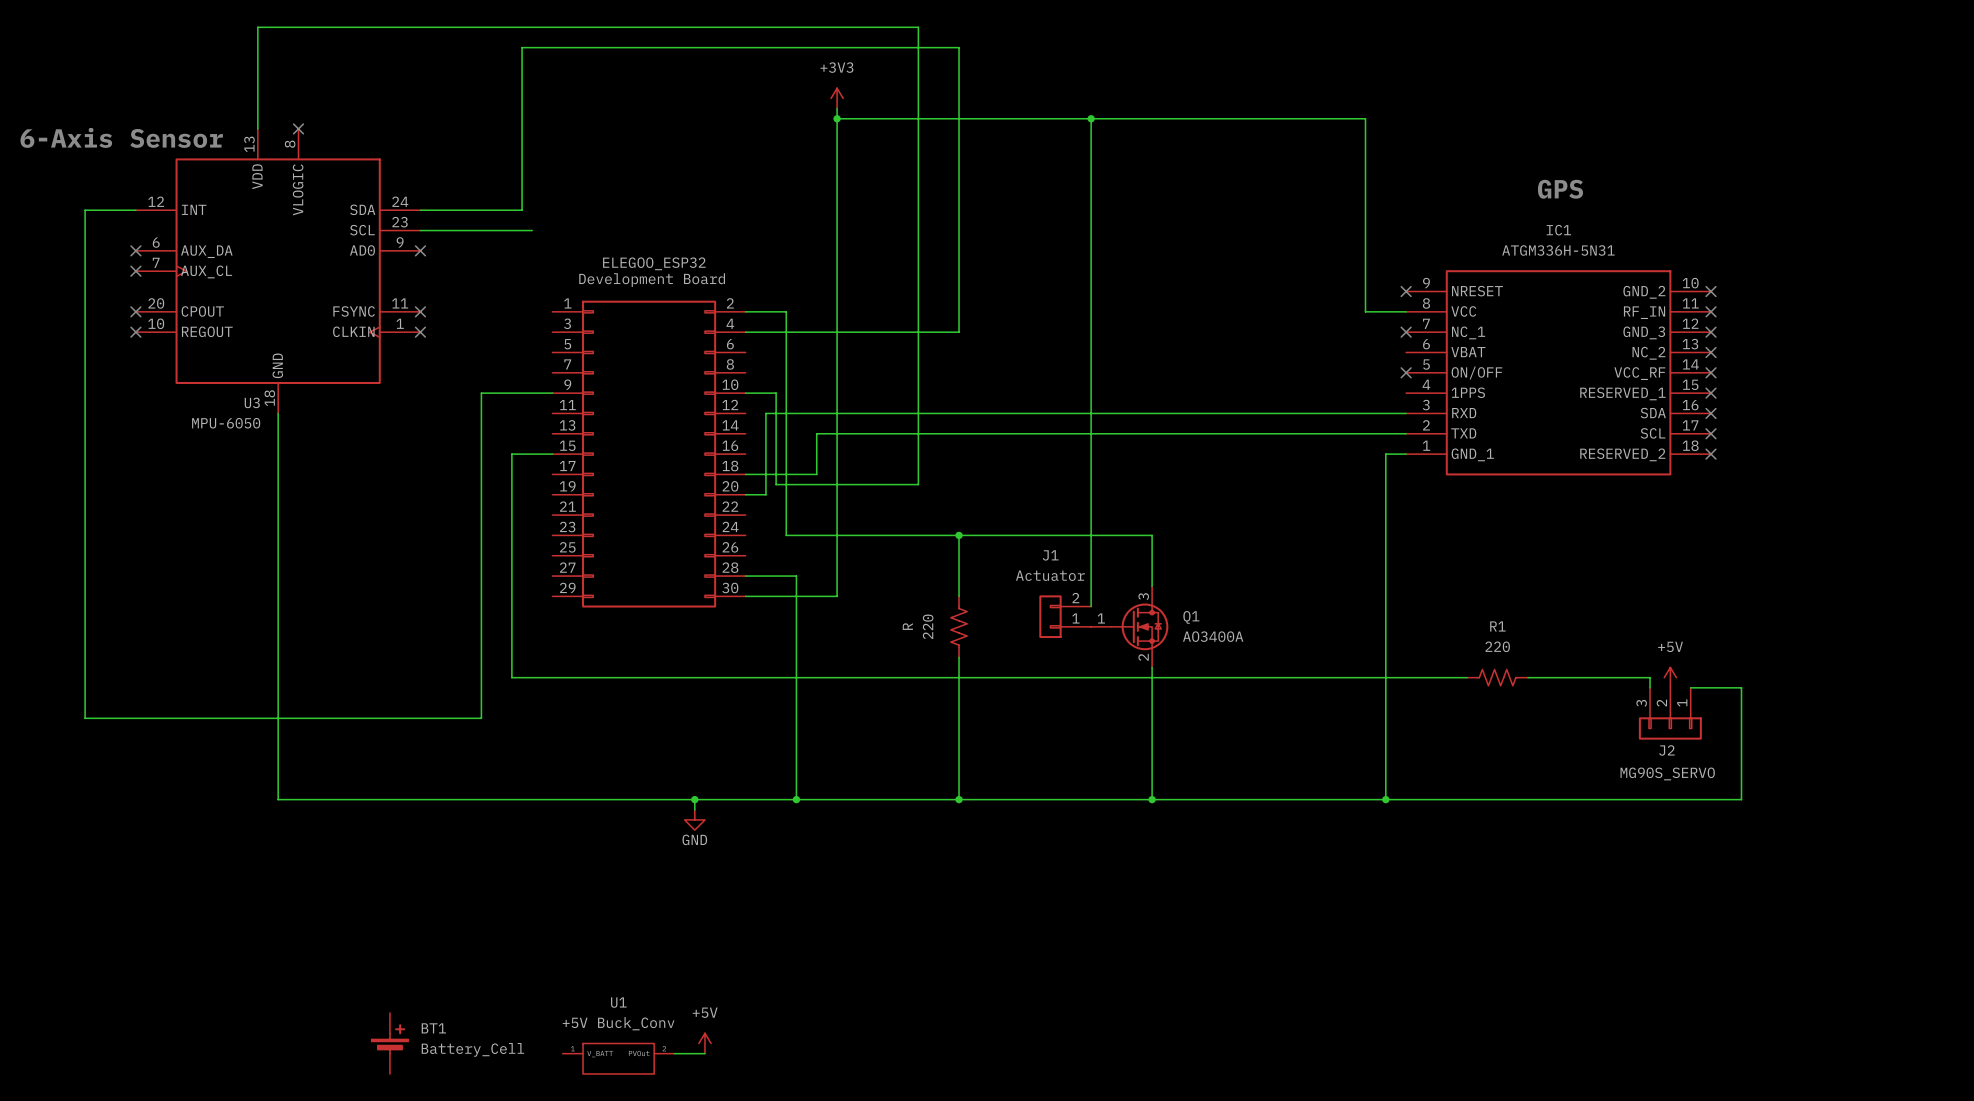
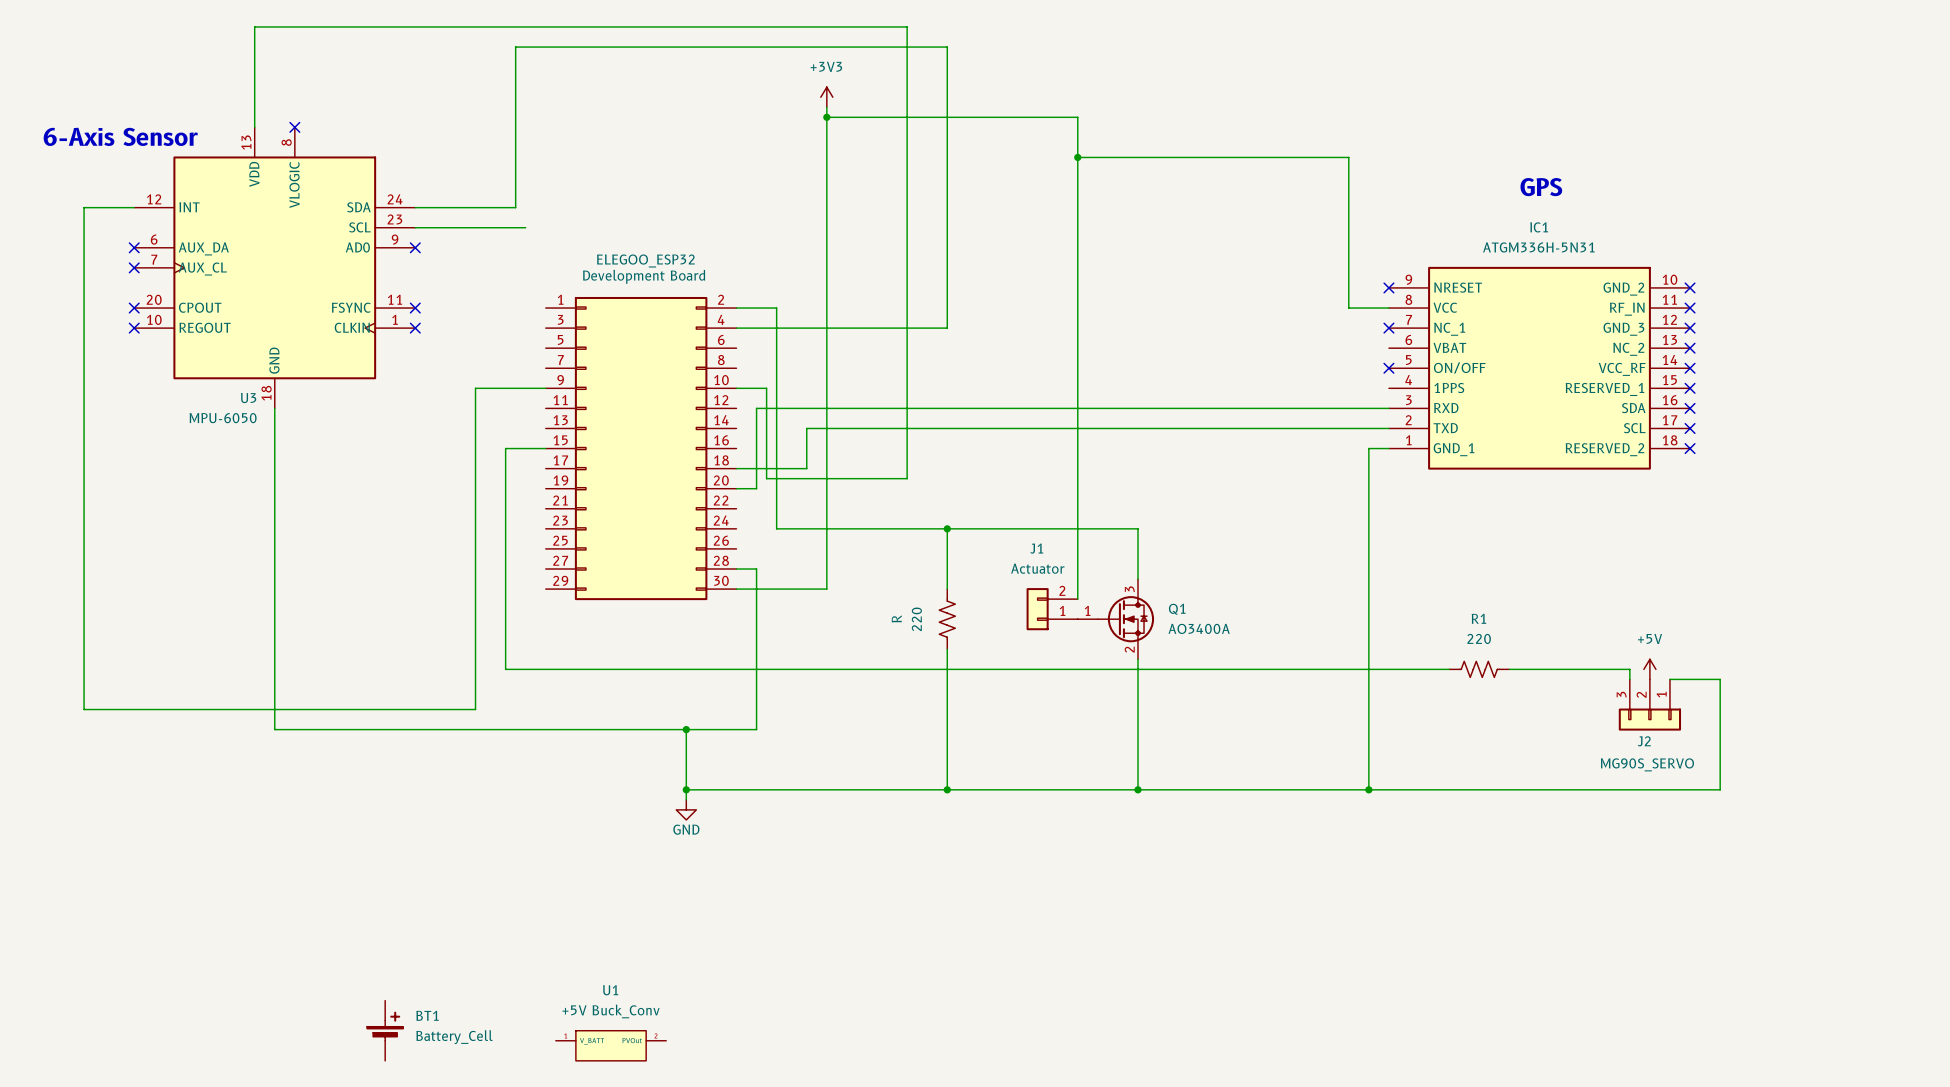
wire: (1091, 118) (1365, 118) (1365, 159) -> (1077, 157) (1348, 157)
junction position: (1091, 118) -> (1077, 157)
wire: (765, 576) (796, 576) (796, 799) -> none
wire: (278, 738) (278, 799) (694, 799) -> (274, 729) (756, 729) (756, 569)
wire: none -> (686, 729) (686, 789)
junction: none -> (686, 729)
junction: (796, 799) -> none
power symbol: +5V (704, 1043) -> none
wire: (674, 1053) (704, 1053) -> none

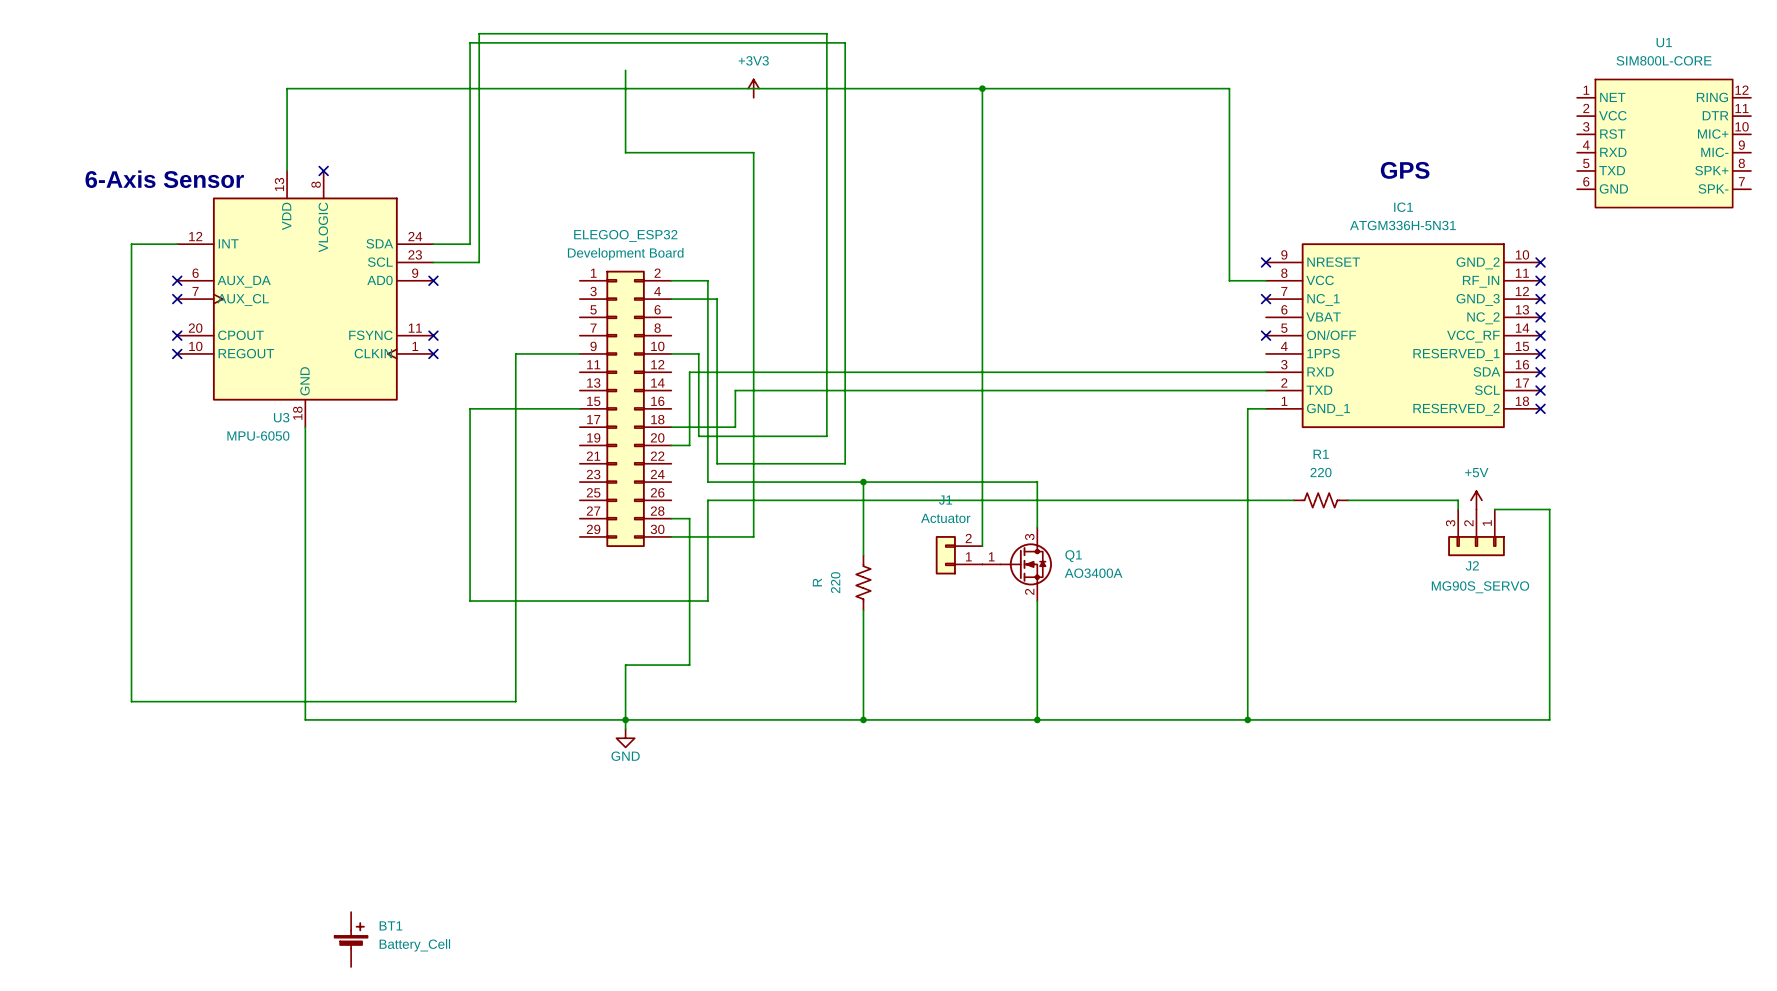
wire: (907, 37) (907, 26) (254, 26) (254, 127) -> (826, 33) (479, 33) (479, 262) (433, 262)
wire: (927, 47) (947, 47) (947, 328) (786, 328) -> (845, 42) (845, 463) (717, 463) (717, 299)
junction: none -> (982, 88)
wire: (826, 107) (826, 167) -> (625, 70) (625, 152) (753, 152)
wire: (826, 117) (1077, 117) -> (982, 88) (982, 106)
junction: (826, 117) -> none
no-connect mark: (294, 127) -> none
text position: 6-Axis Sensor (120, 136) -> 6-Axis Sensor (164, 179)
wire: (1077, 157) (1348, 157) -> (287, 170) (287, 88) (1229, 88) (1229, 143)
junction: (1077, 157) -> none
no-connect mark: none -> (323, 170)
wire: (134, 207) (84, 207) (84, 709) (475, 709) (475, 388) (545, 388) -> none
wire: (415, 207) (515, 207) -> (433, 244) (470, 244) (470, 189)
wire: (415, 227) (525, 227) -> none
no-connect mark: (134, 247) -> none
no-connect mark: (415, 247) -> none
no-connect mark: (134, 267) -> none
wire: none -> (177, 244) (131, 244) (131, 701) (515, 701) (515, 353) (579, 353)
U3 position: (274, 267) -> (305, 299)
ELEGOO_ESP32 symbol: [545, 296, 737, 601] -> [579, 270, 672, 548]
no-connect mark: (134, 308) -> none
no-connect mark: none -> (177, 280)
no-connect mark: (415, 308) -> none
no-connect mark: none -> (433, 280)
no-connect mark: (134, 328) -> none
no-connect mark: none -> (177, 299)
no-connect mark: (415, 328) -> none
no-connect mark: none -> (177, 335)
no-connect mark: none -> (433, 335)
no-connect mark: none -> (177, 353)
no-connect mark: none -> (433, 353)
wire: (274, 408) (274, 729) (686, 729) -> none
wire: (515, 448) (505, 448) (505, 669) (1449, 669) -> (470, 408) (470, 601) (707, 601) (707, 500) (1293, 500)
wire: none -> (305, 427) (305, 719) (625, 719)
R position: (947, 619) -> (863, 582)
R1 position: (1479, 669) -> (1320, 500)
wire: (1509, 669) (1629, 669) (1629, 679) -> (1348, 500) (1458, 500) (1458, 509)
power symbol position: +5V (1649, 669) -> +5V (1476, 500)
wire: (1669, 679) (1720, 679) (1720, 789) (1700, 789) -> (1494, 509) (1549, 509) (1549, 719)
J2 position: (1649, 705) -> (1476, 532)
junction: (686, 729) -> none
U1 name position: U1 (610, 990) -> U1 (1664, 42)
U1 value: +5V Buck_Conv (611, 1011) -> SIM800L-CORE (1664, 60)
U1 symbol: [555, 1030, 667, 1061] -> [1577, 78, 1751, 209]

